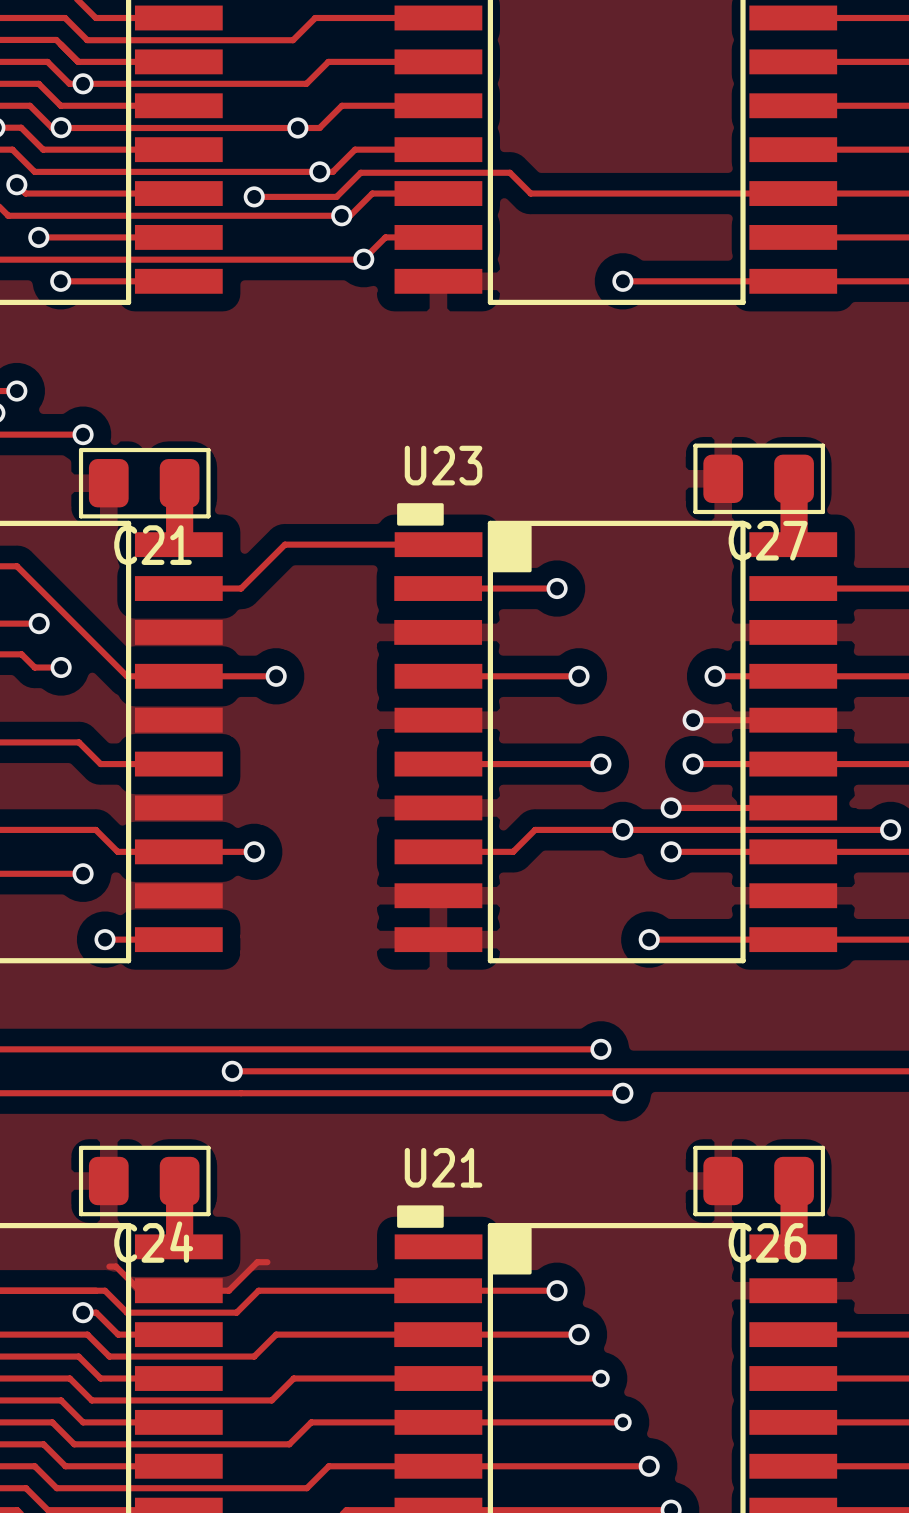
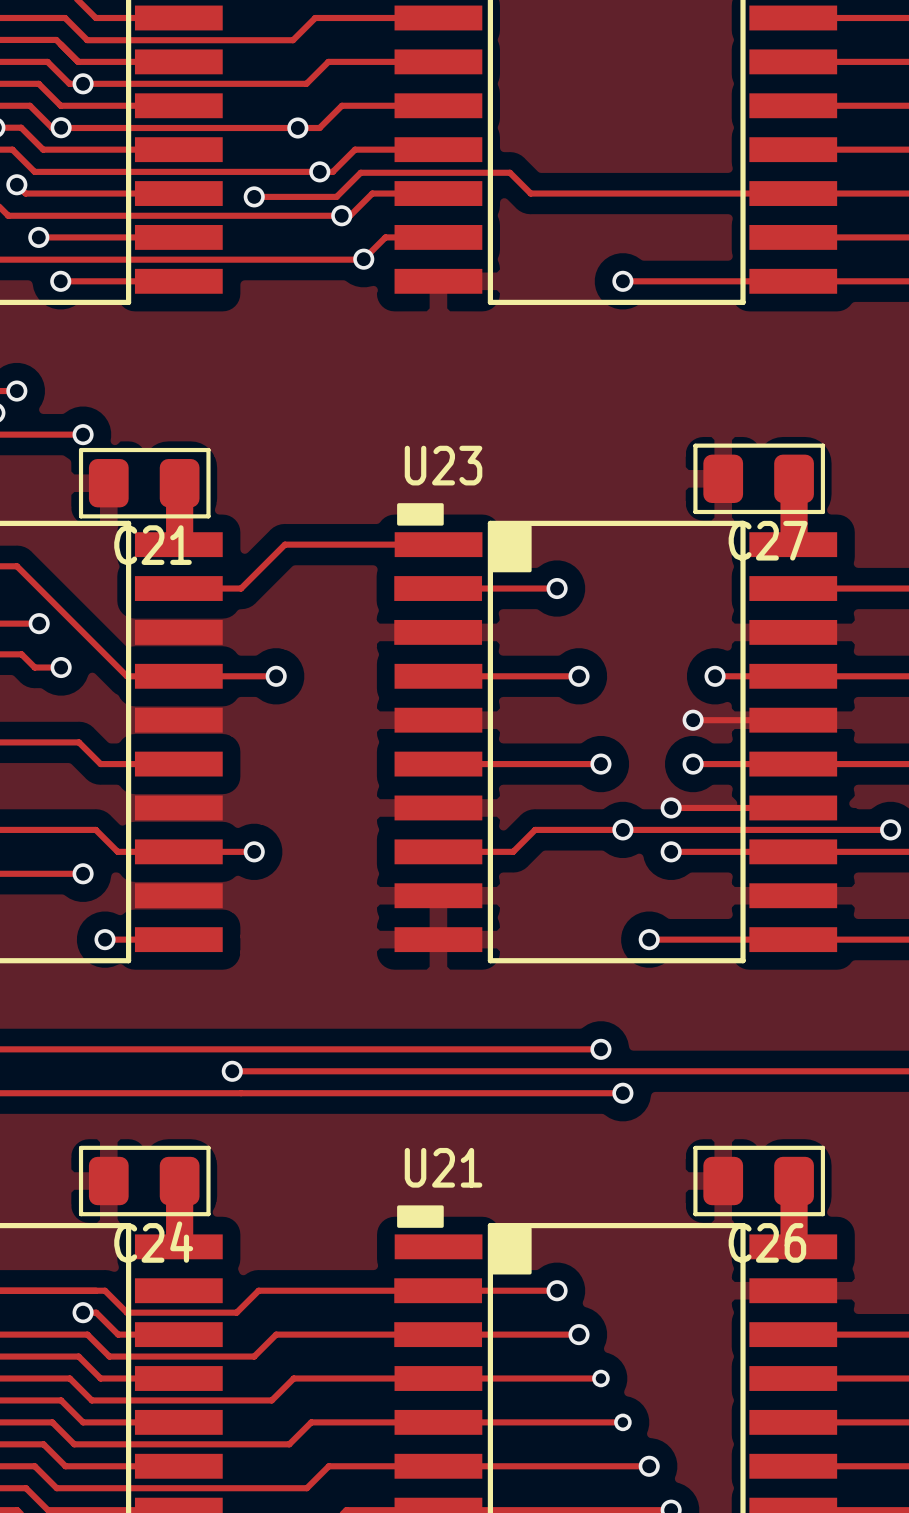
track: (267, 1262) (257, 1262) (228, 1290) (140, 1290) (115, 1266) (109, 1266) -> none

